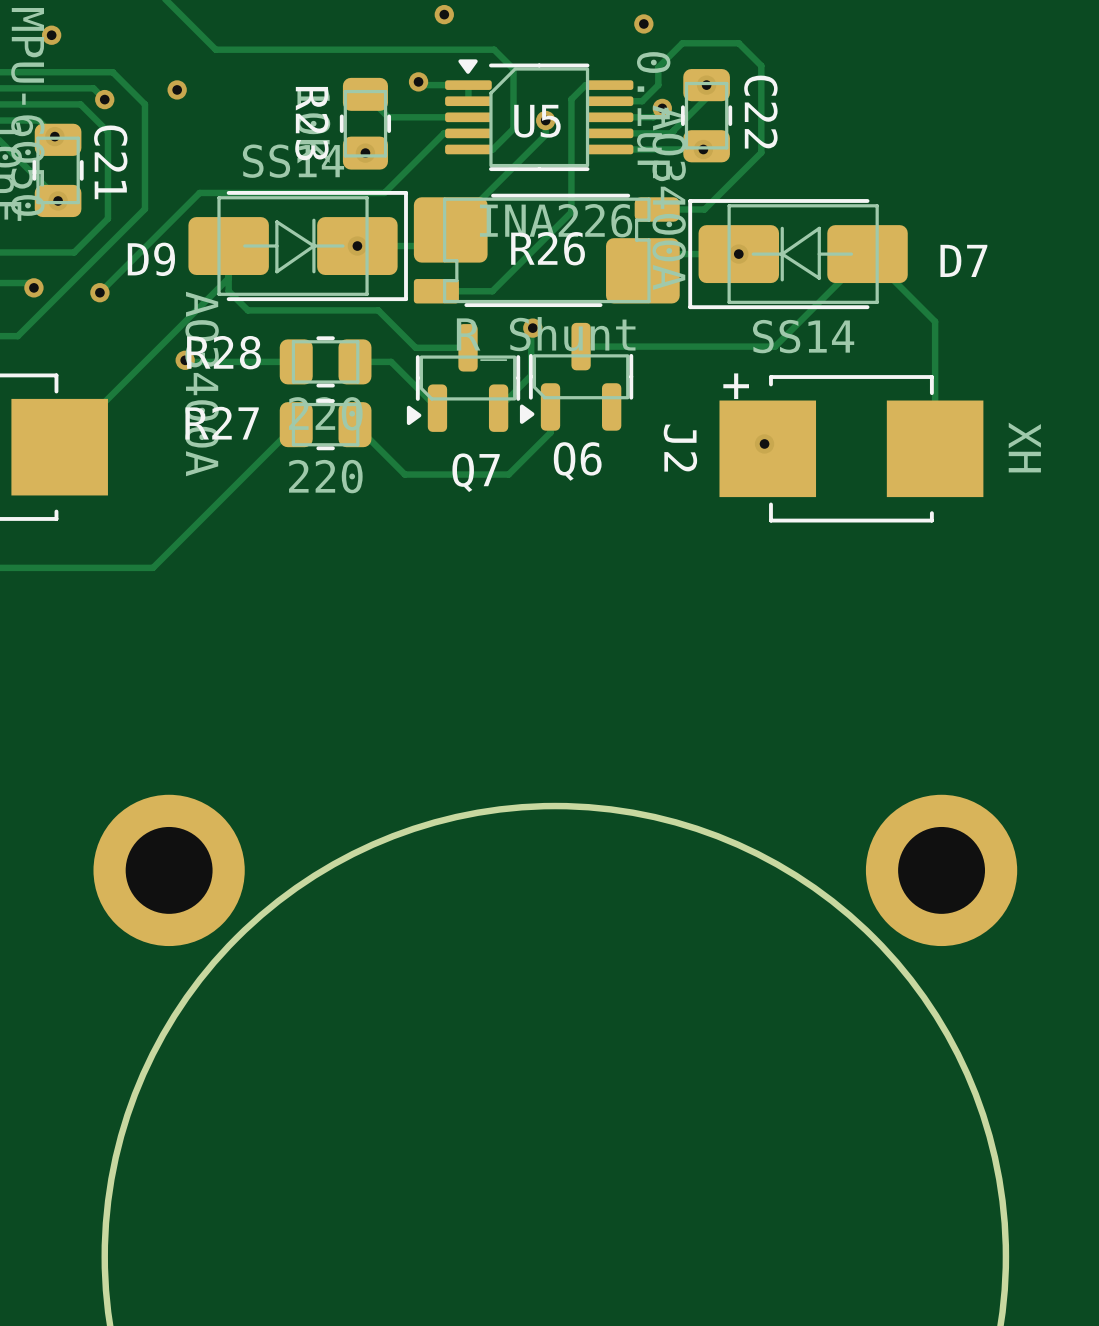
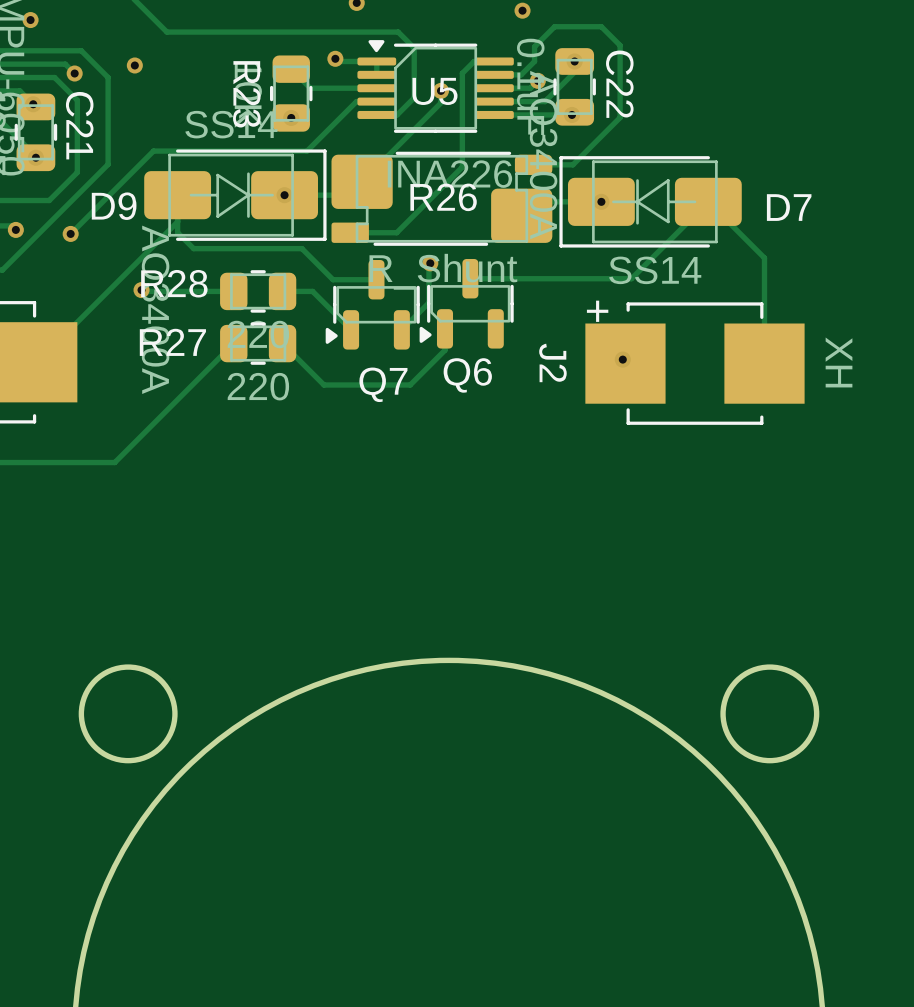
round board edge: none -> [78, 664, 178, 764]
round board edge: none -> [720, 664, 820, 764]
part: (169, 870) -> none
part: (941, 870) -> none

